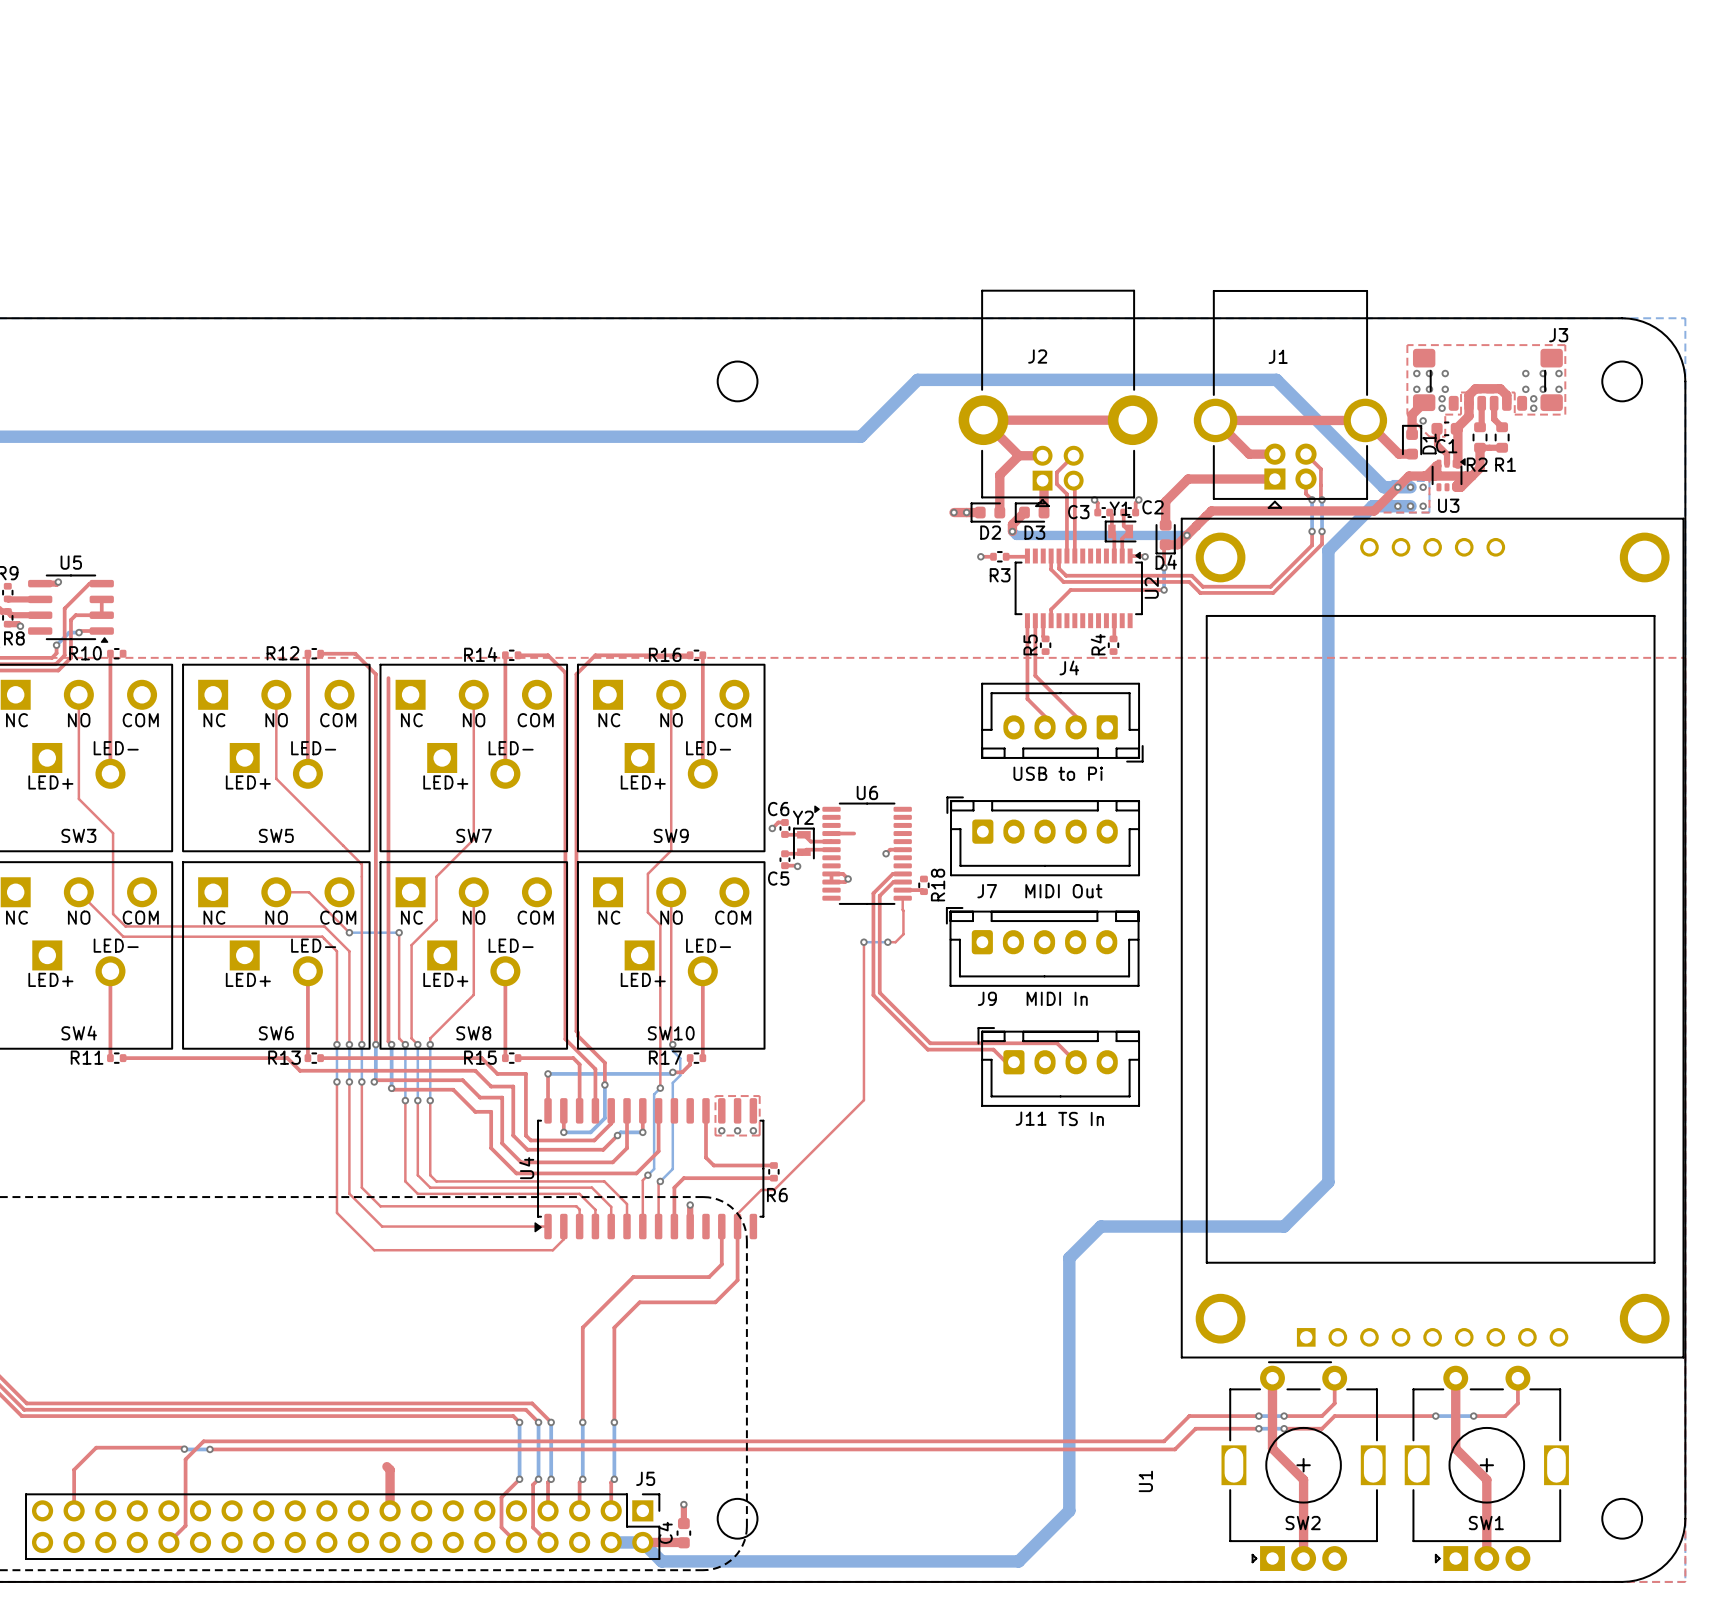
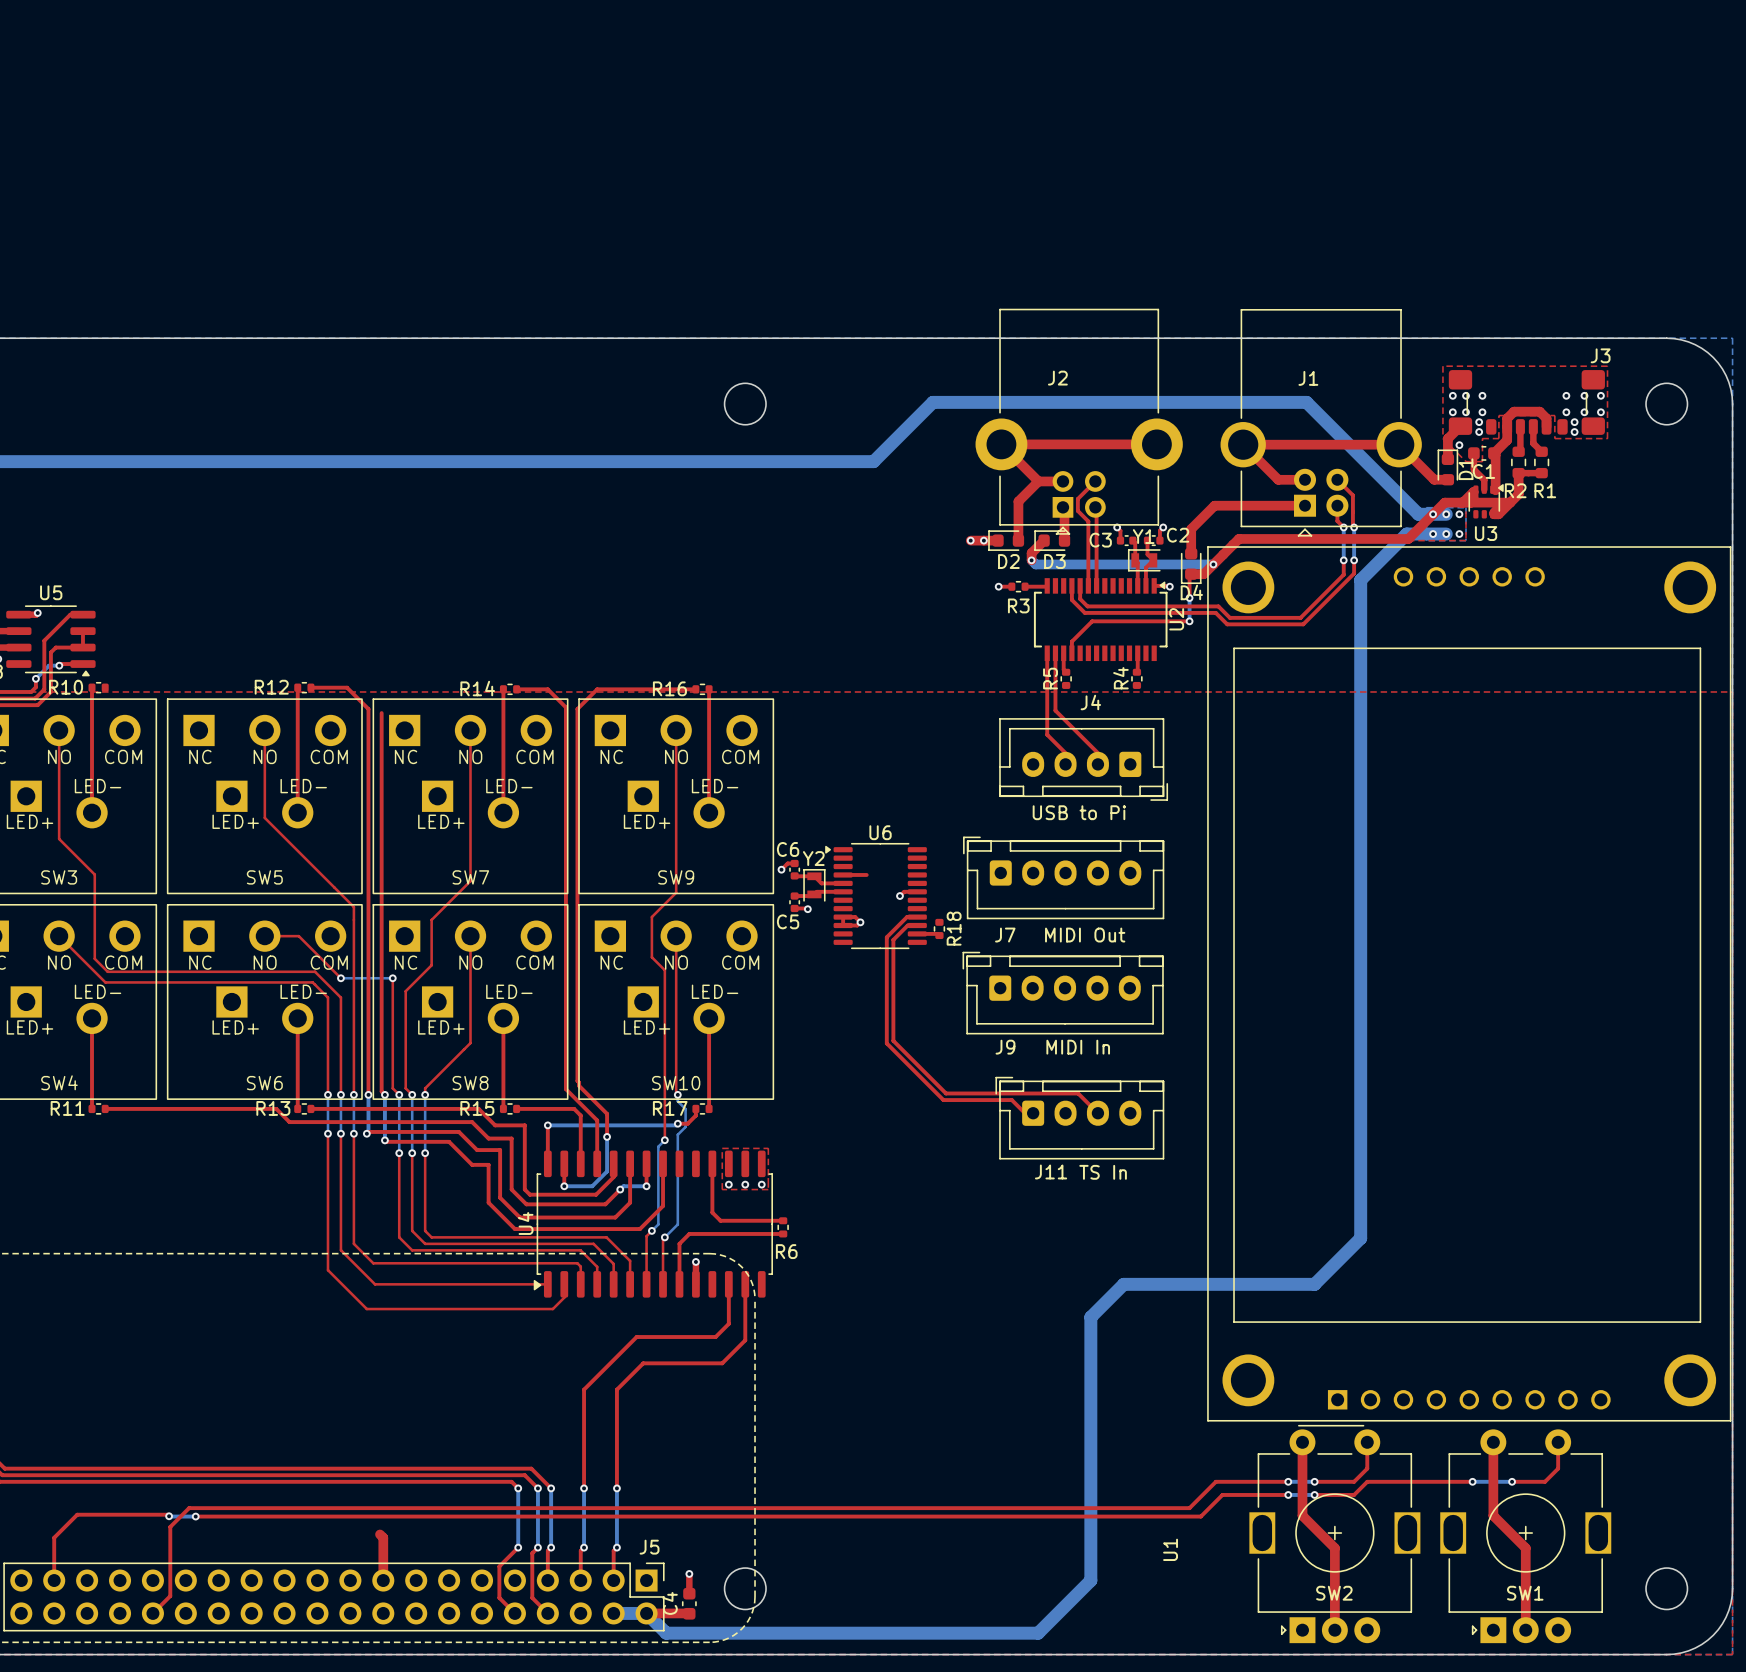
top track: (902, 898) (903, 934) (895, 942) (887, 942) -> none
top track: (863, 942) (863, 1100) (774, 1189) (761, 1189) (737, 1213) (737, 1226) -> none
bottom track: (863, 942) (887, 942) -> none
via: (863, 942) -> none
via: (887, 942) -> none

